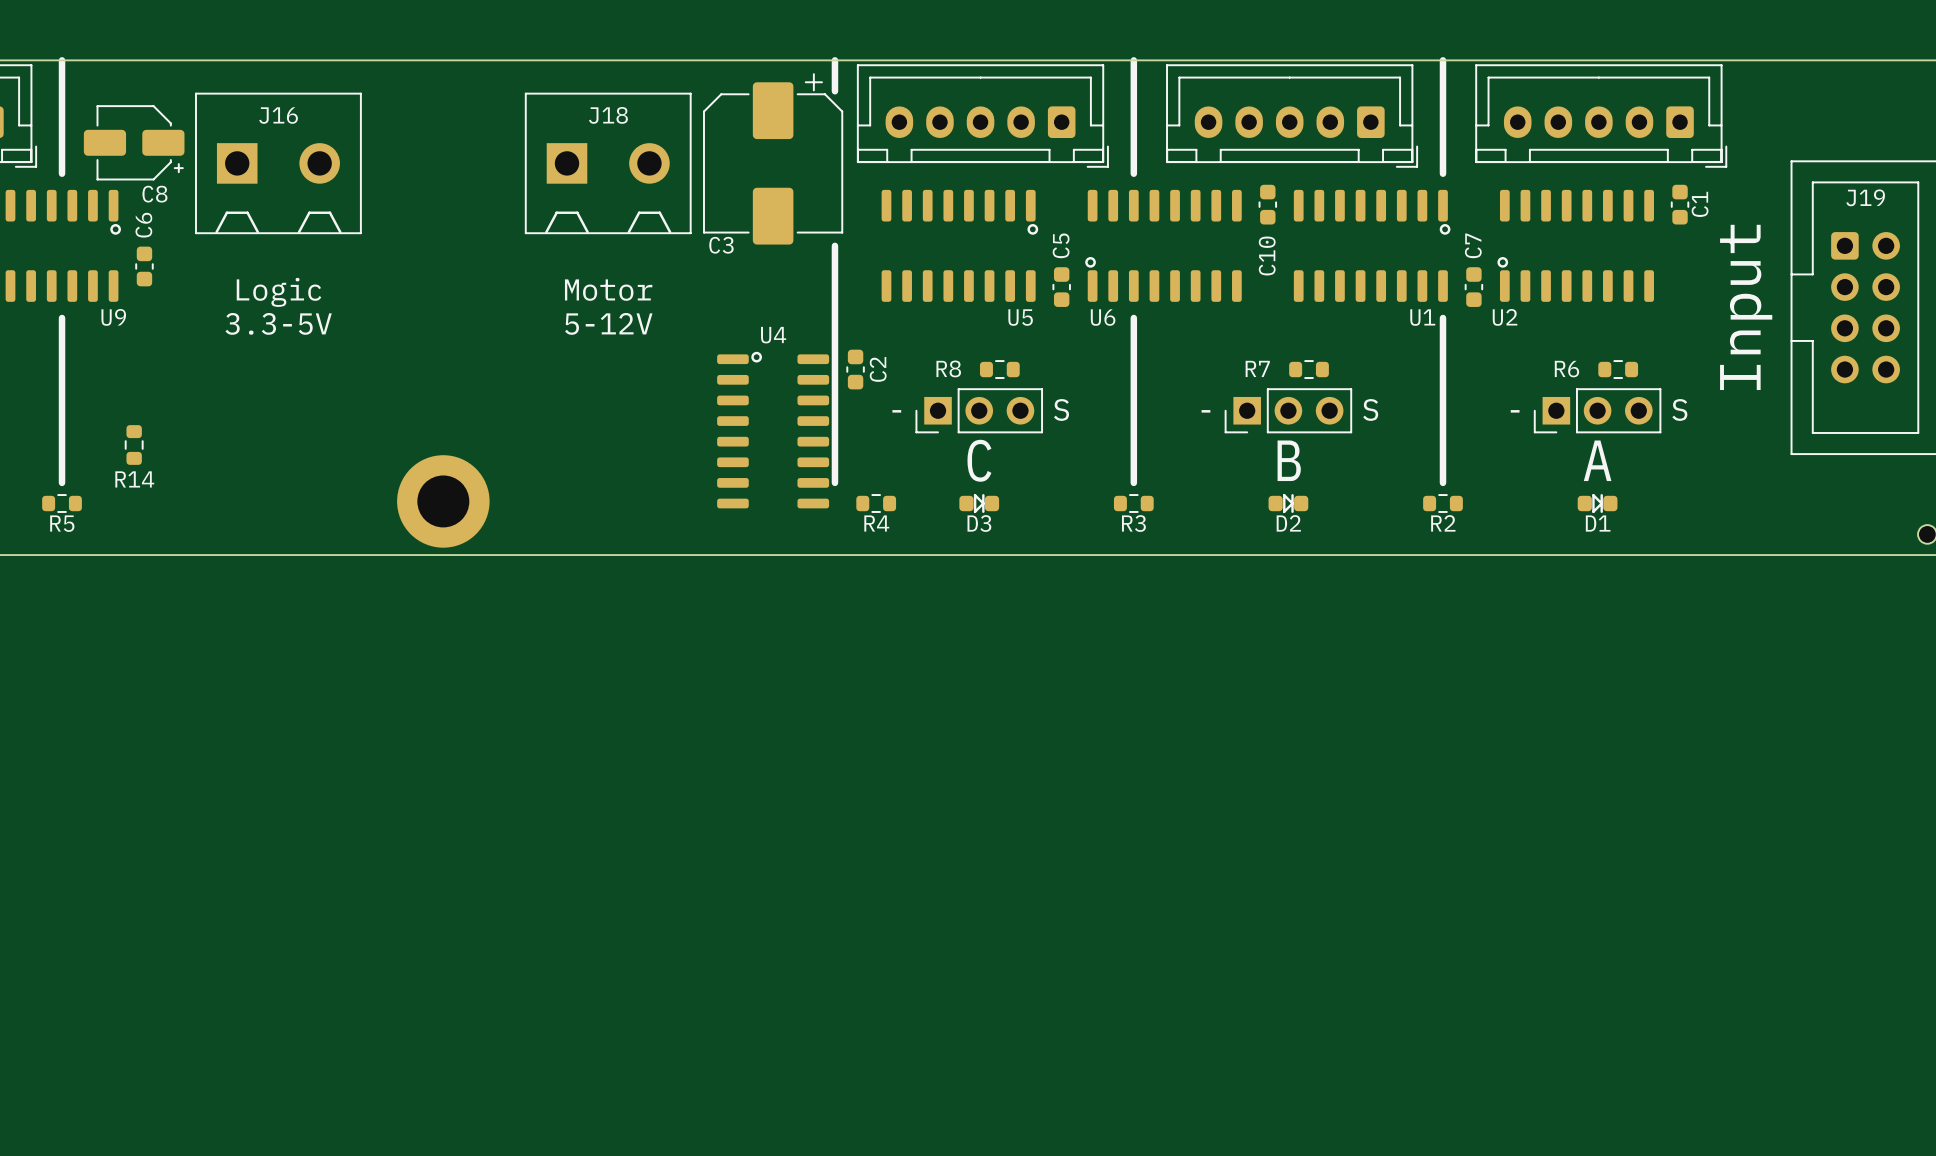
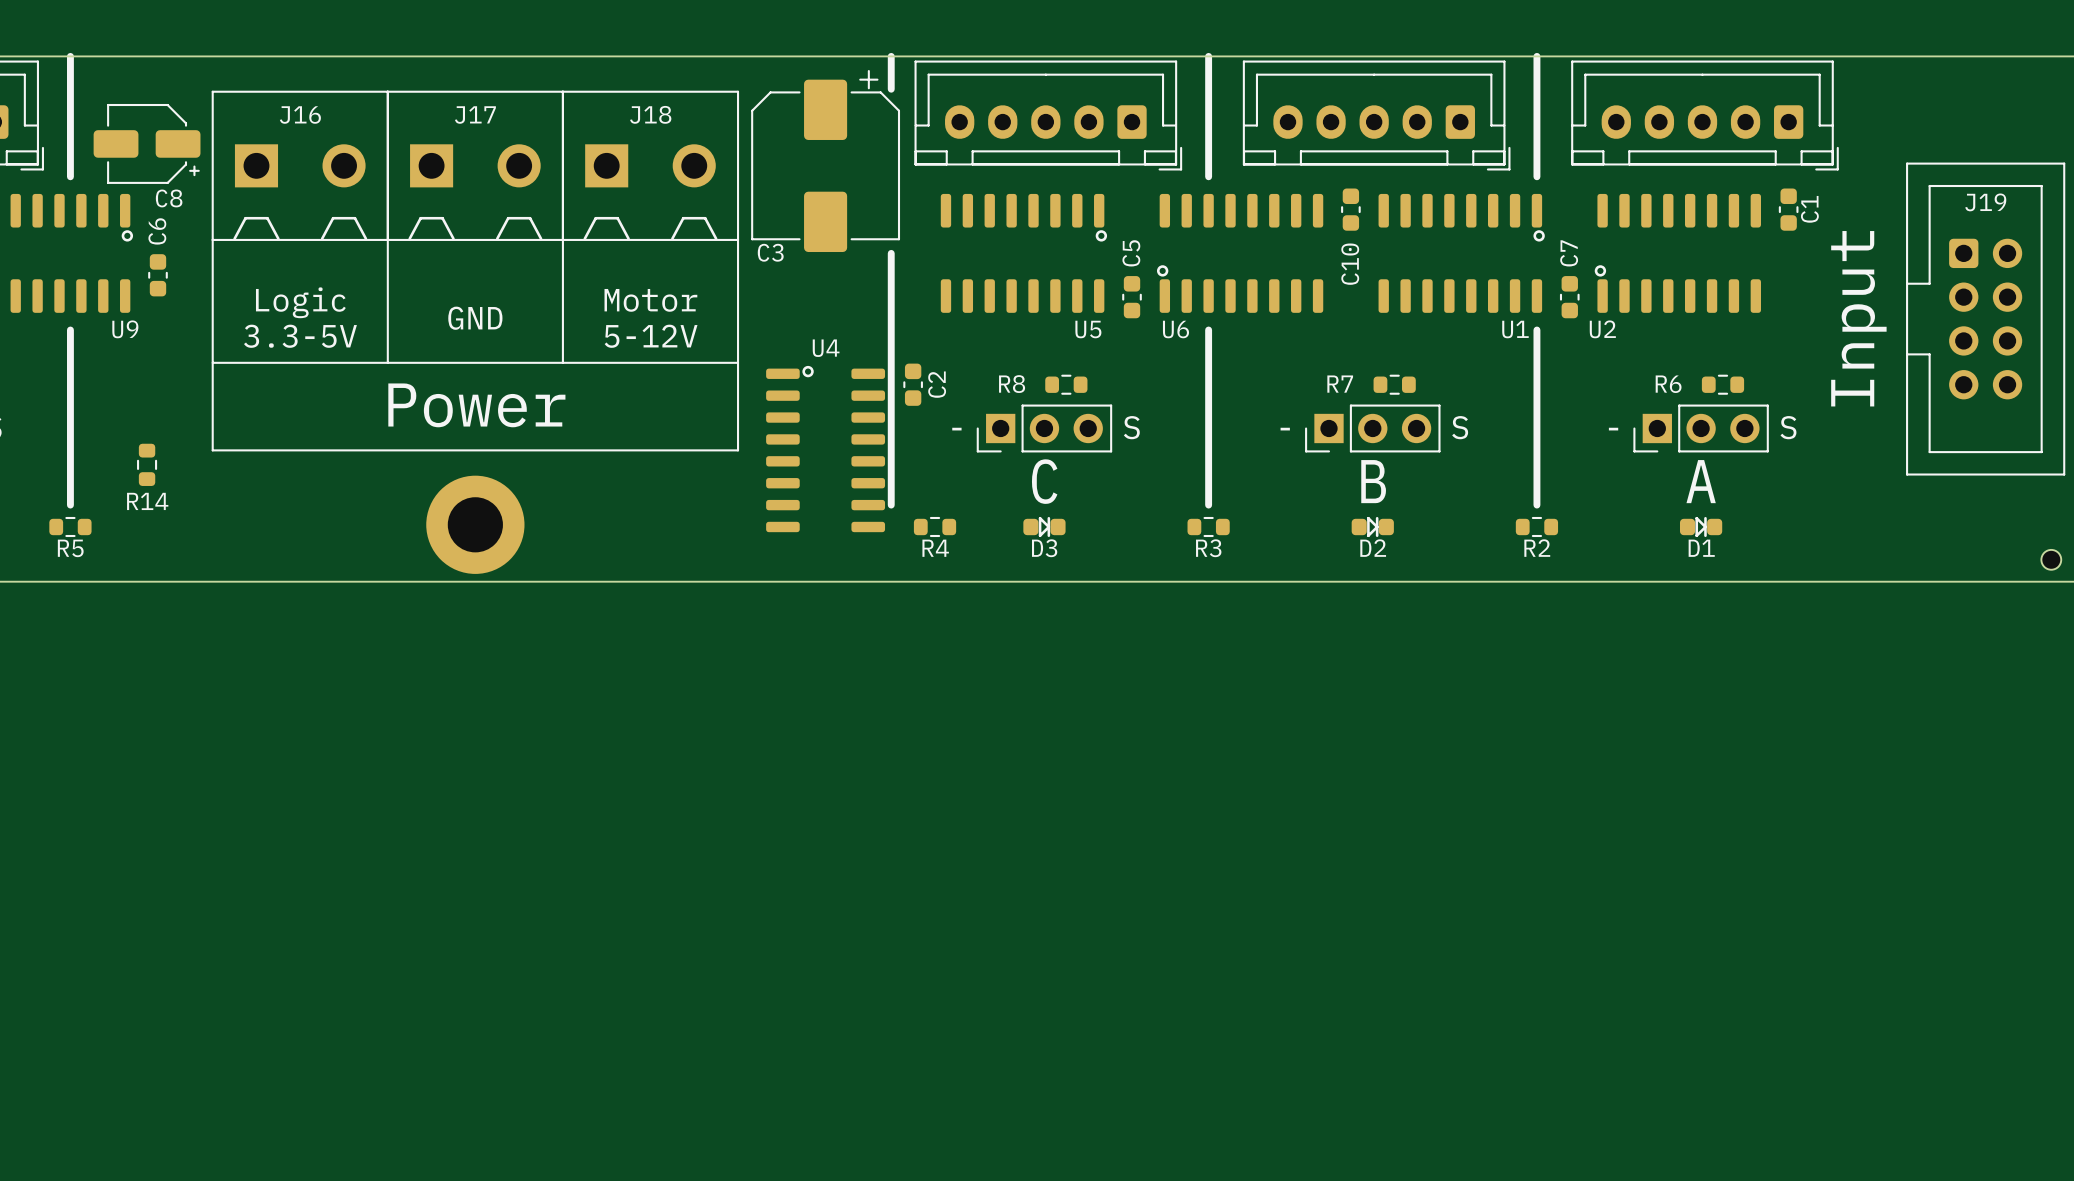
J17: none -> (475, 165)
line: none -> (212, 239) (212, 450) (738, 450) (738, 239)
line: none -> (387, 239) (387, 362)
line: none -> (562, 239) (562, 362)
text: none -> GND (475, 318)
line: none -> (212, 362) (738, 362)
text: none -> Power (476, 405)

